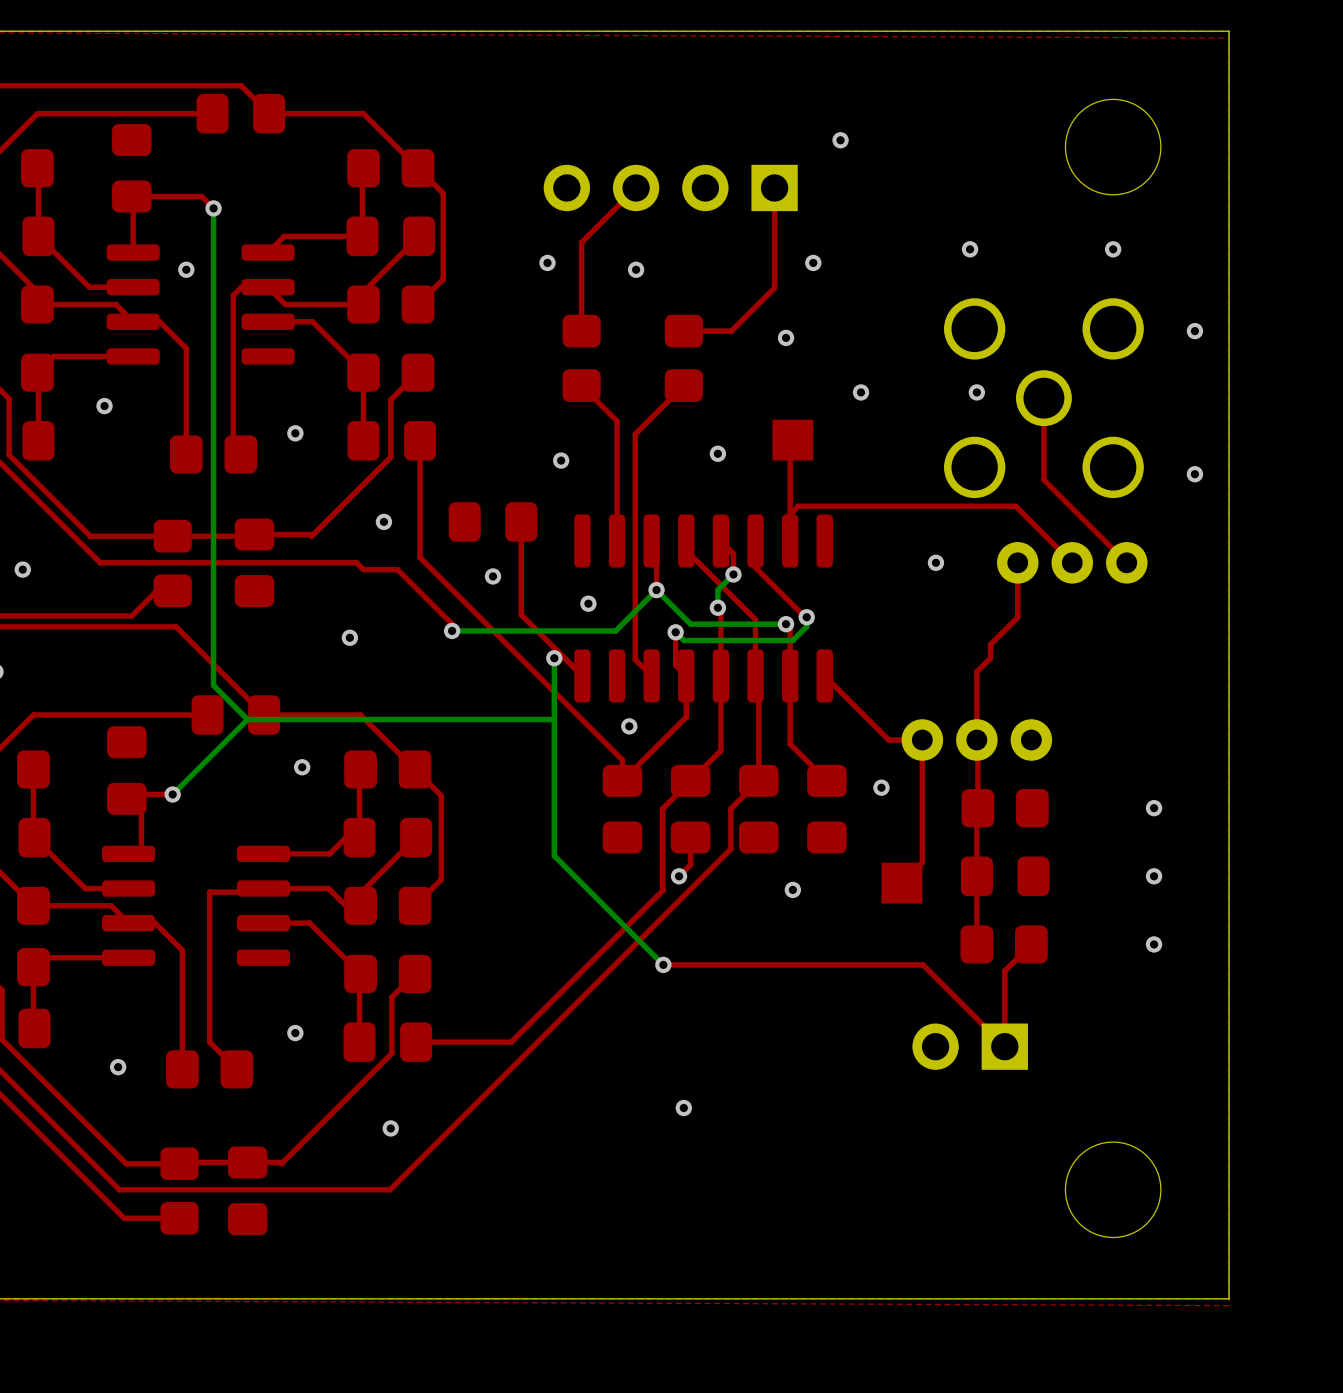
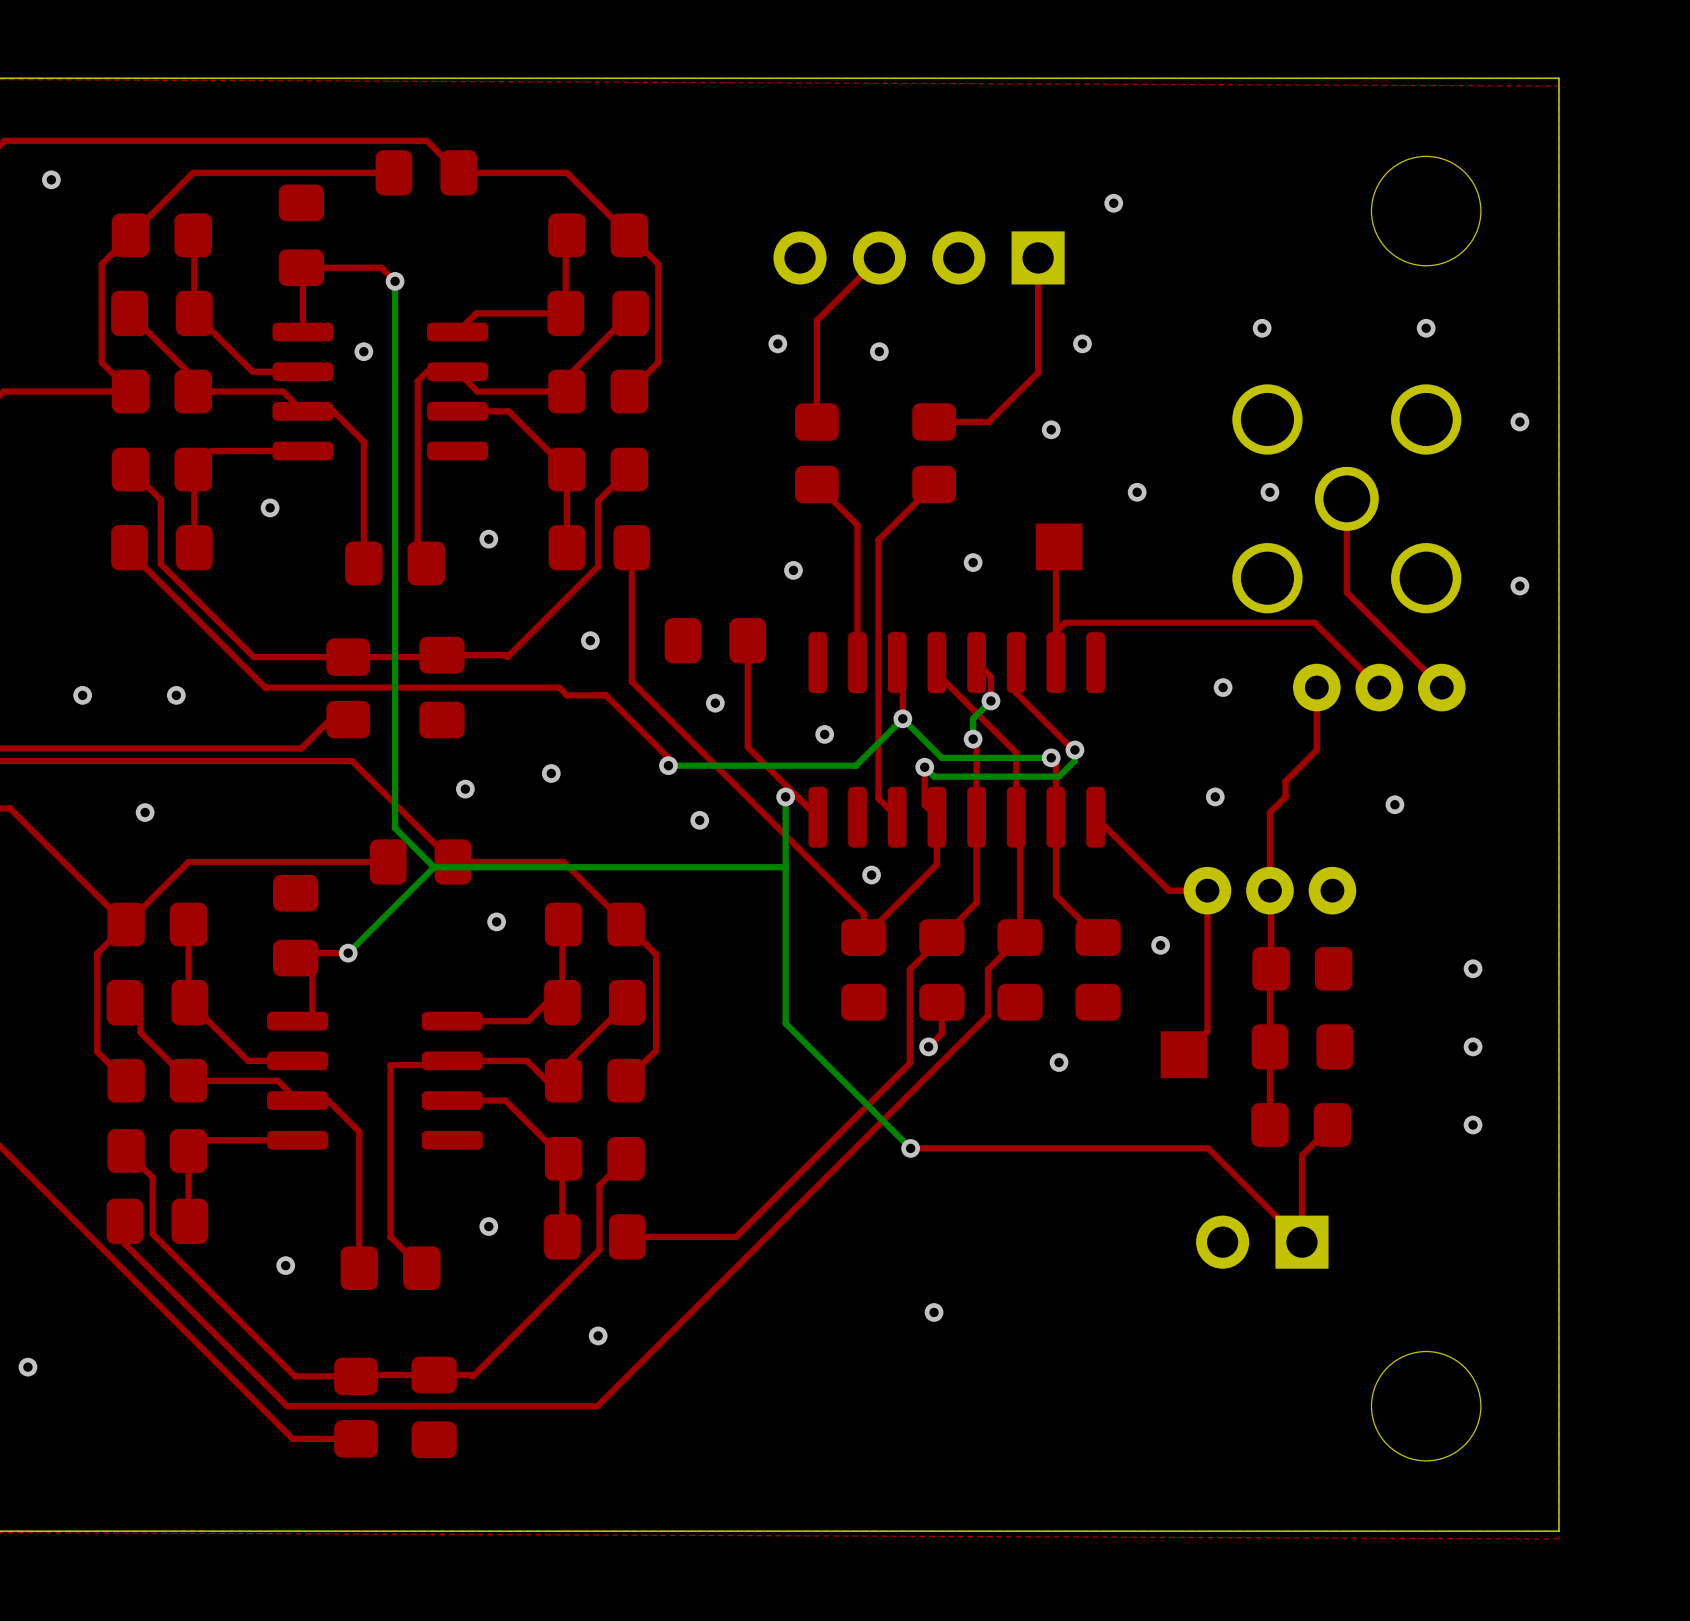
via: none -> (465, 789)
via: none -> (1215, 796)
via: none -> (1394, 804)
via: none -> (699, 820)

